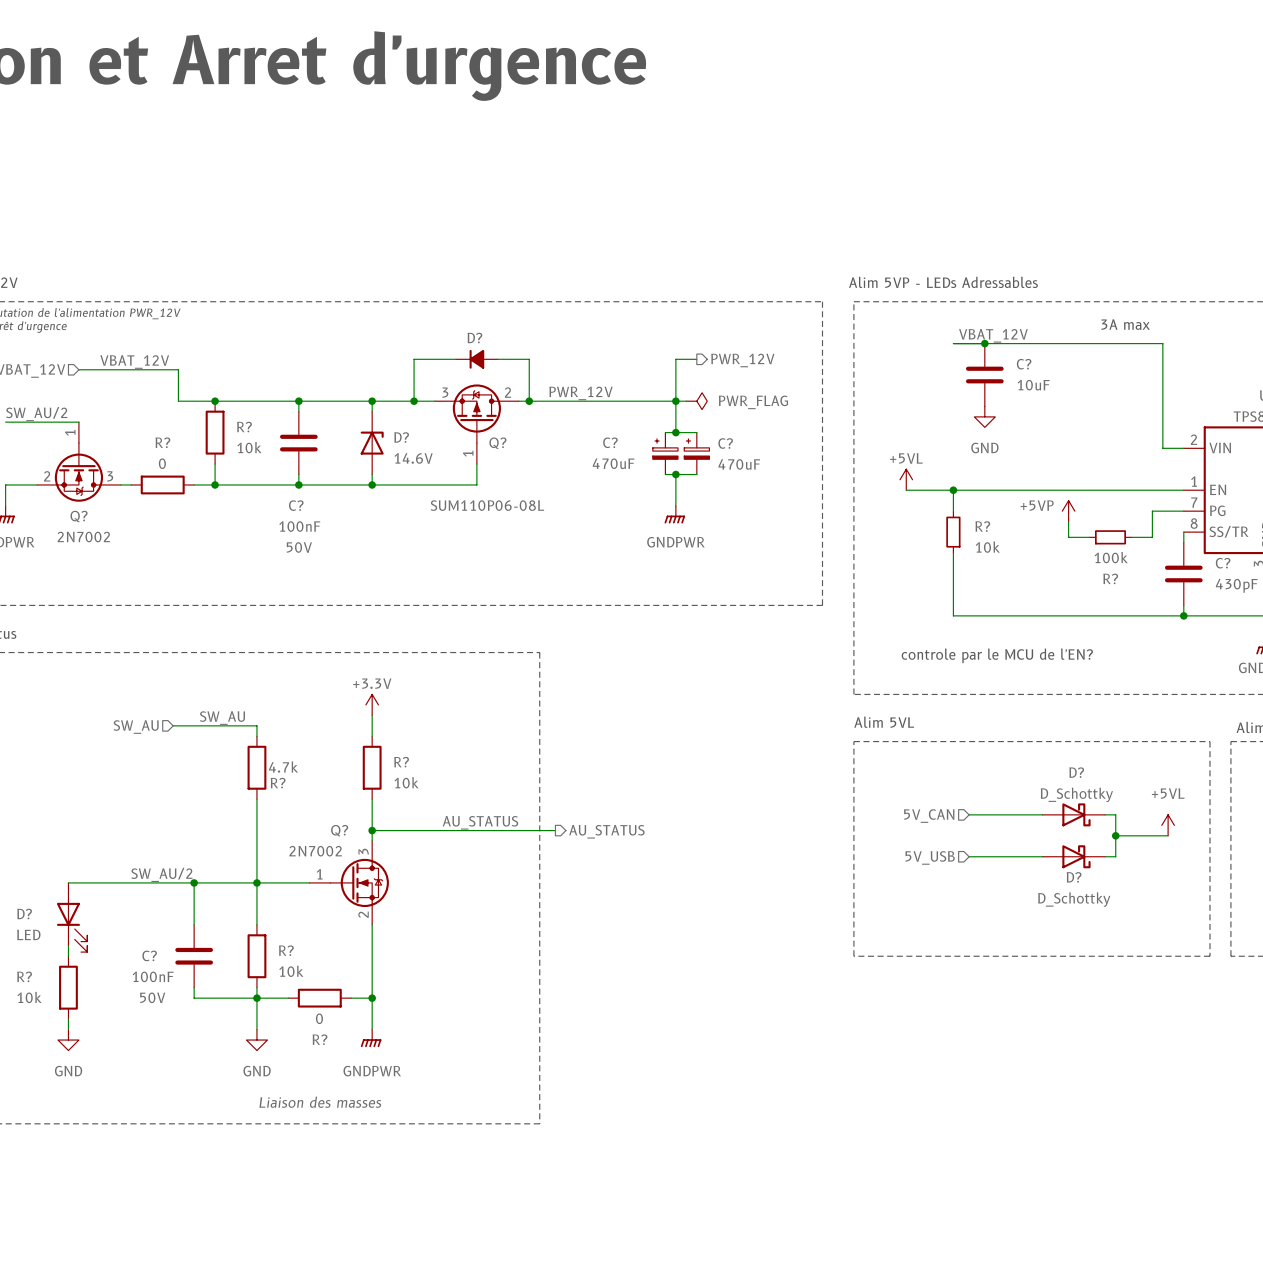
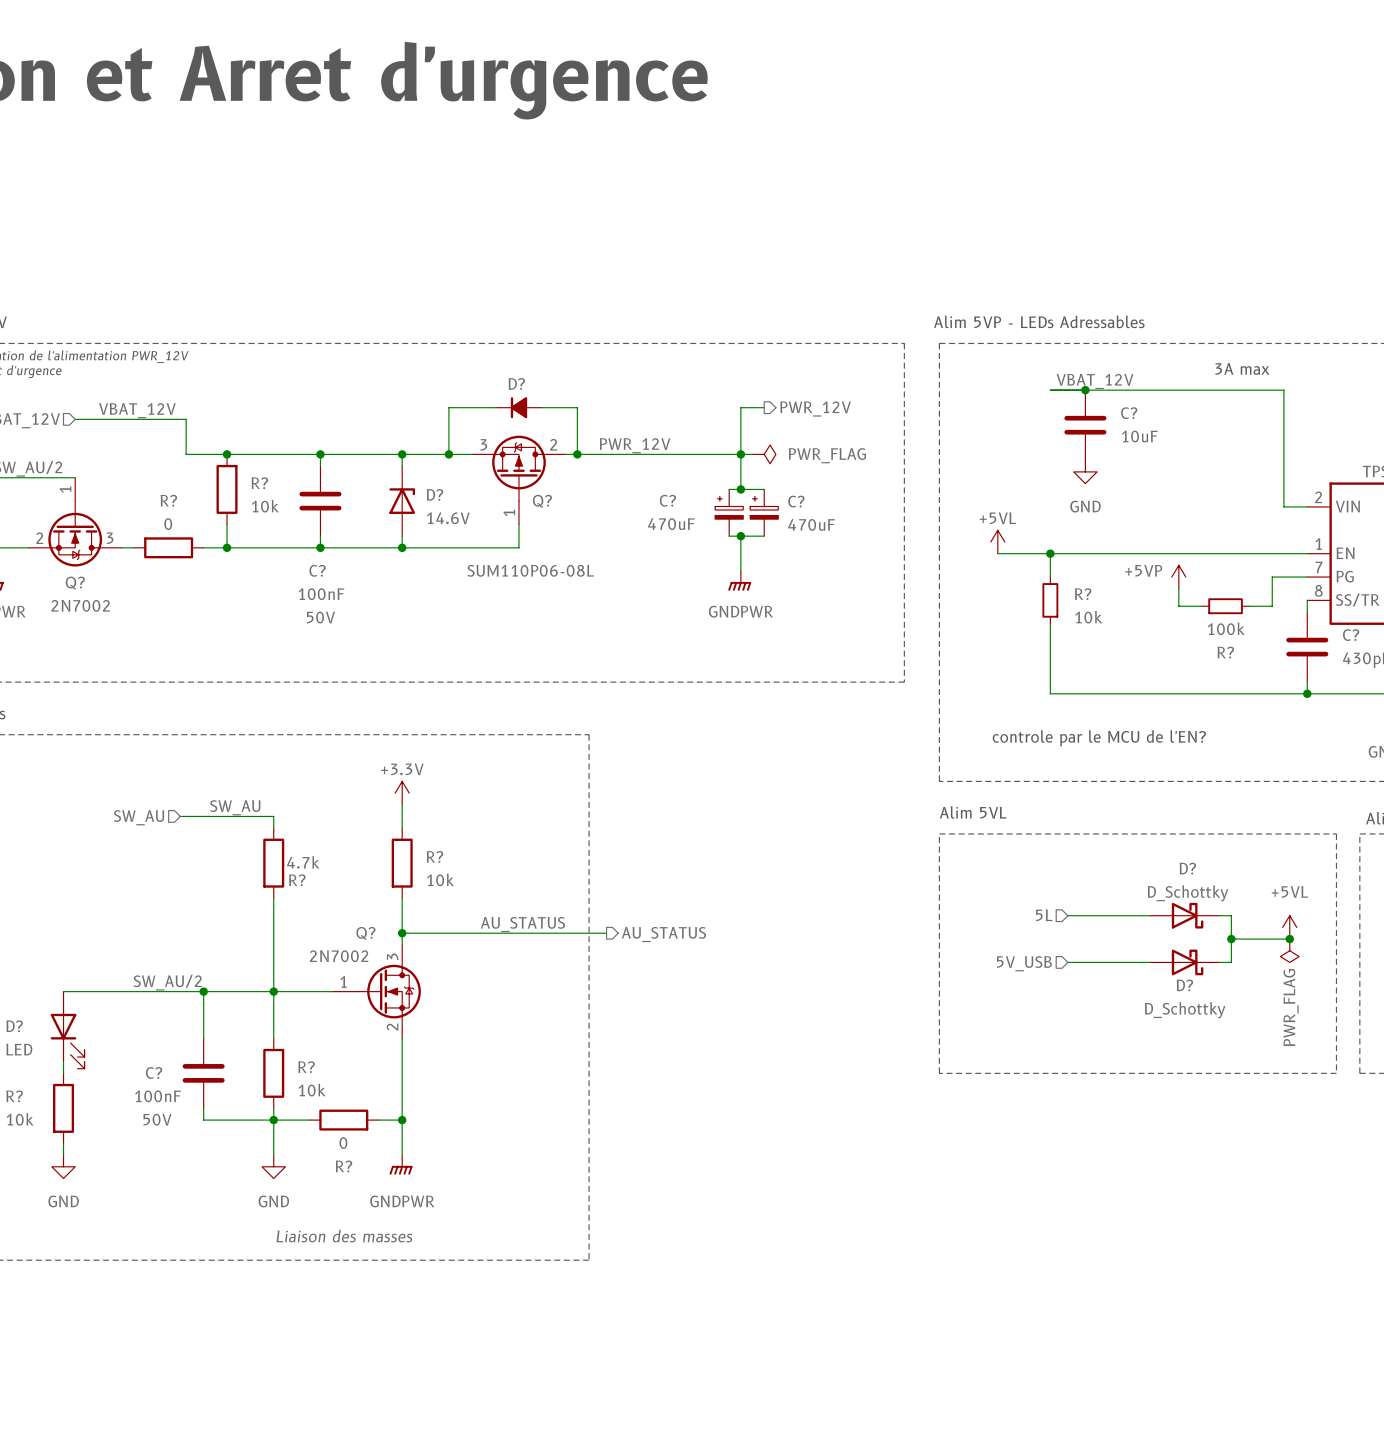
hierarchical label: 5V_CAN (929, 816) -> 5L (1044, 915)
junction: none -> (1289, 939)
power symbol: none -> PWR_FLAG (1289, 950)

